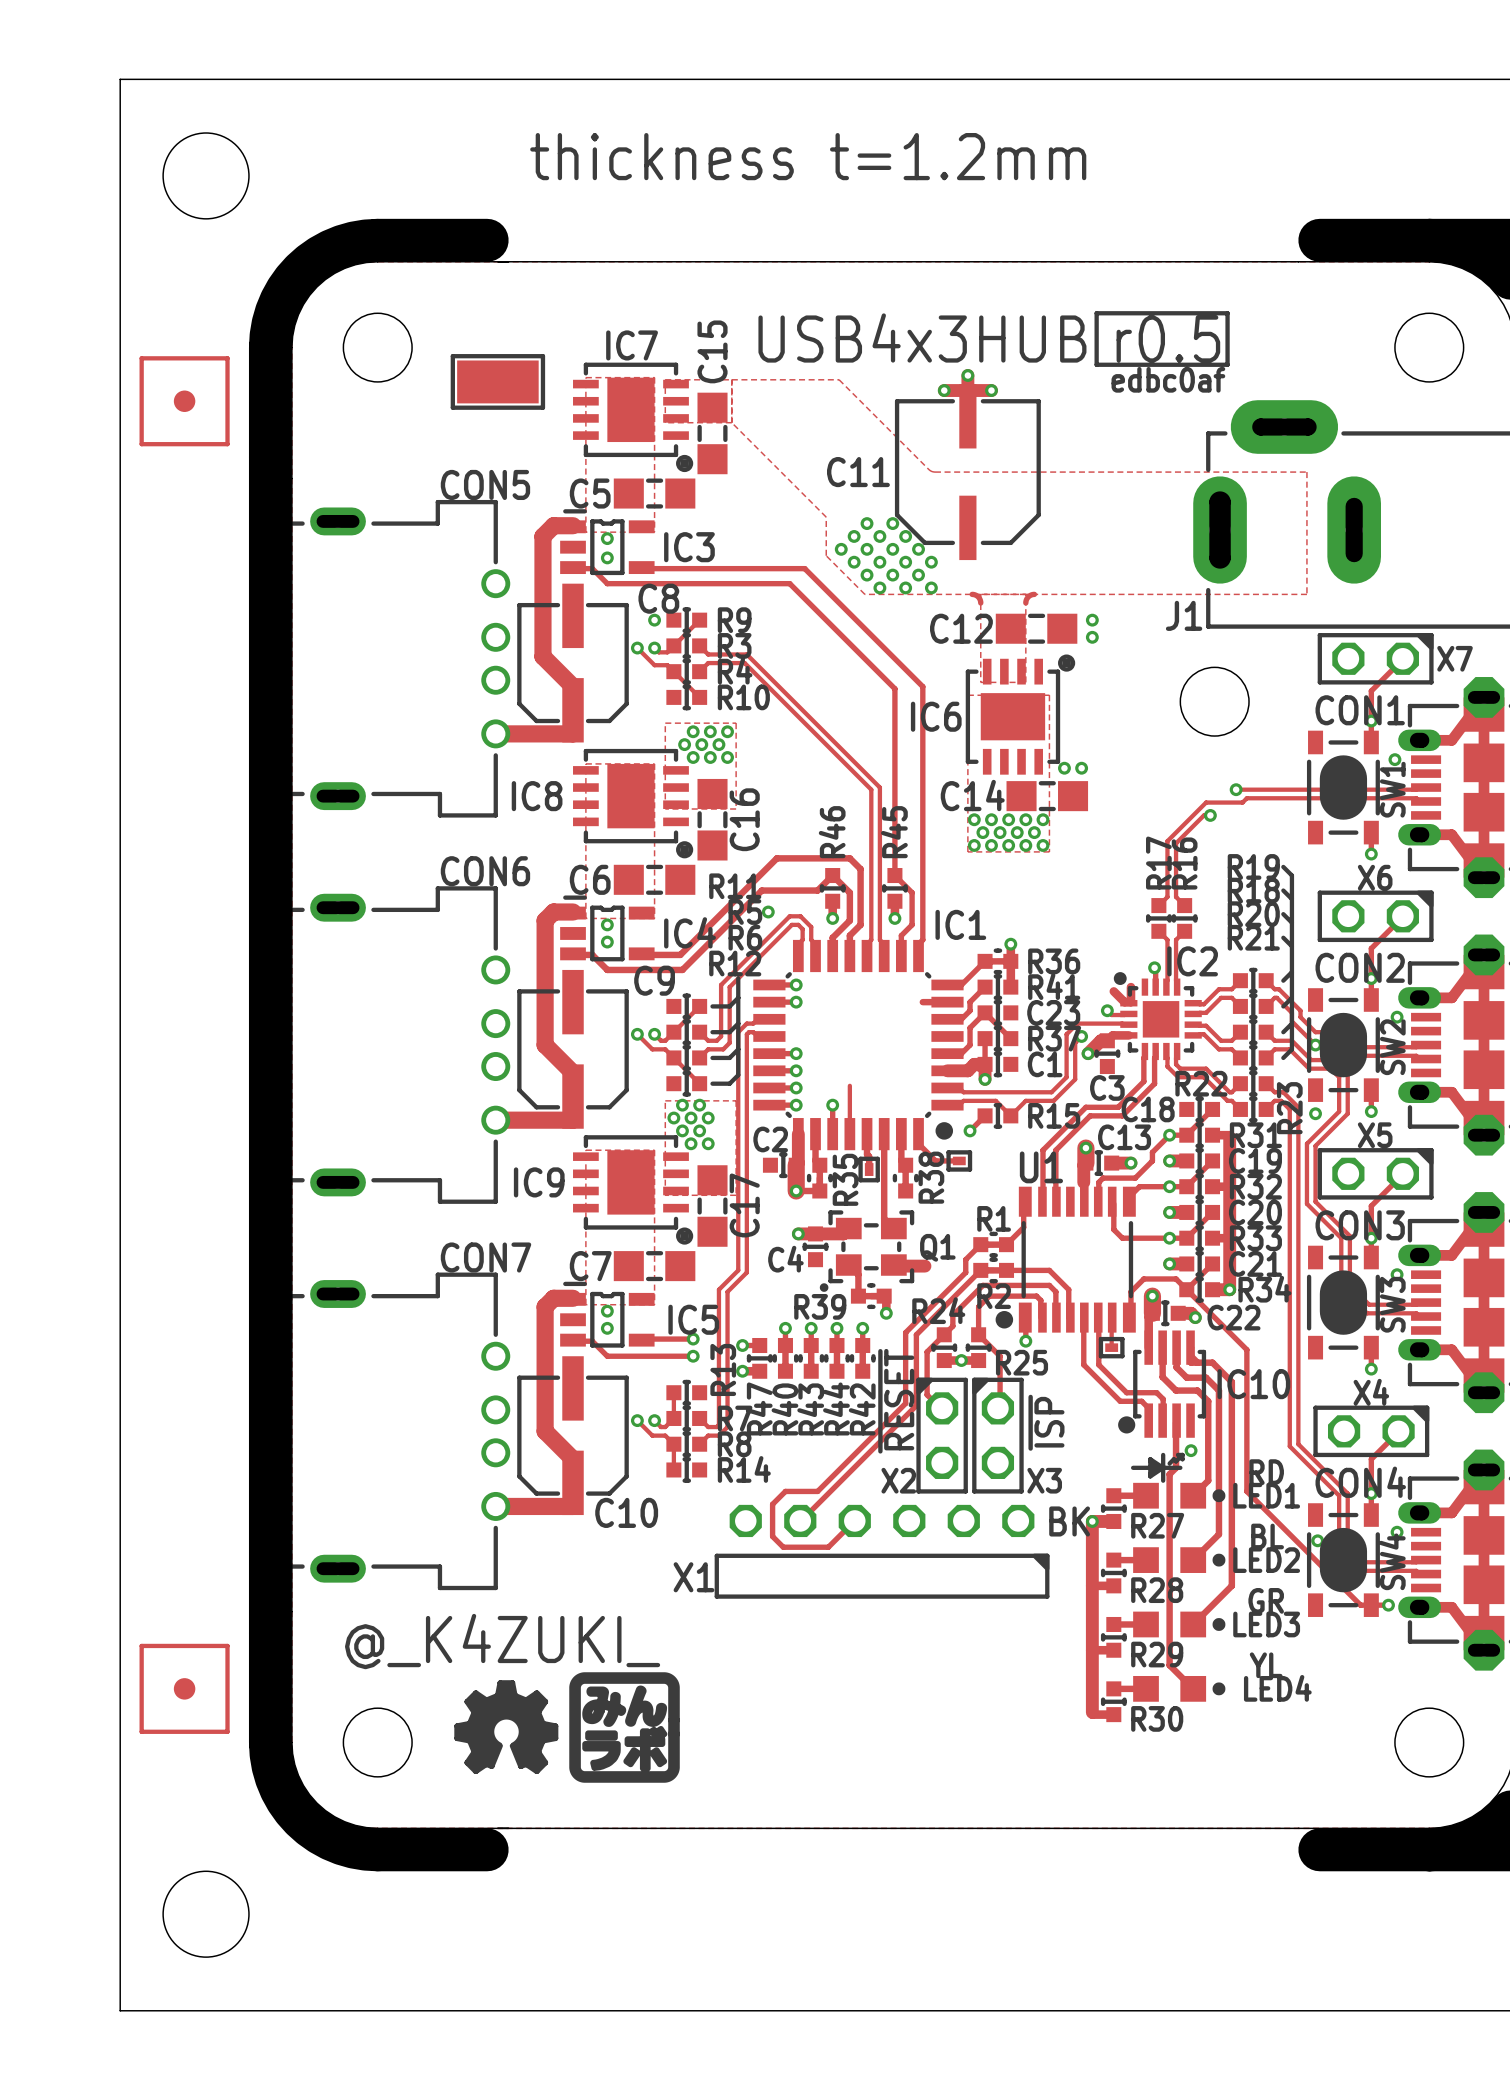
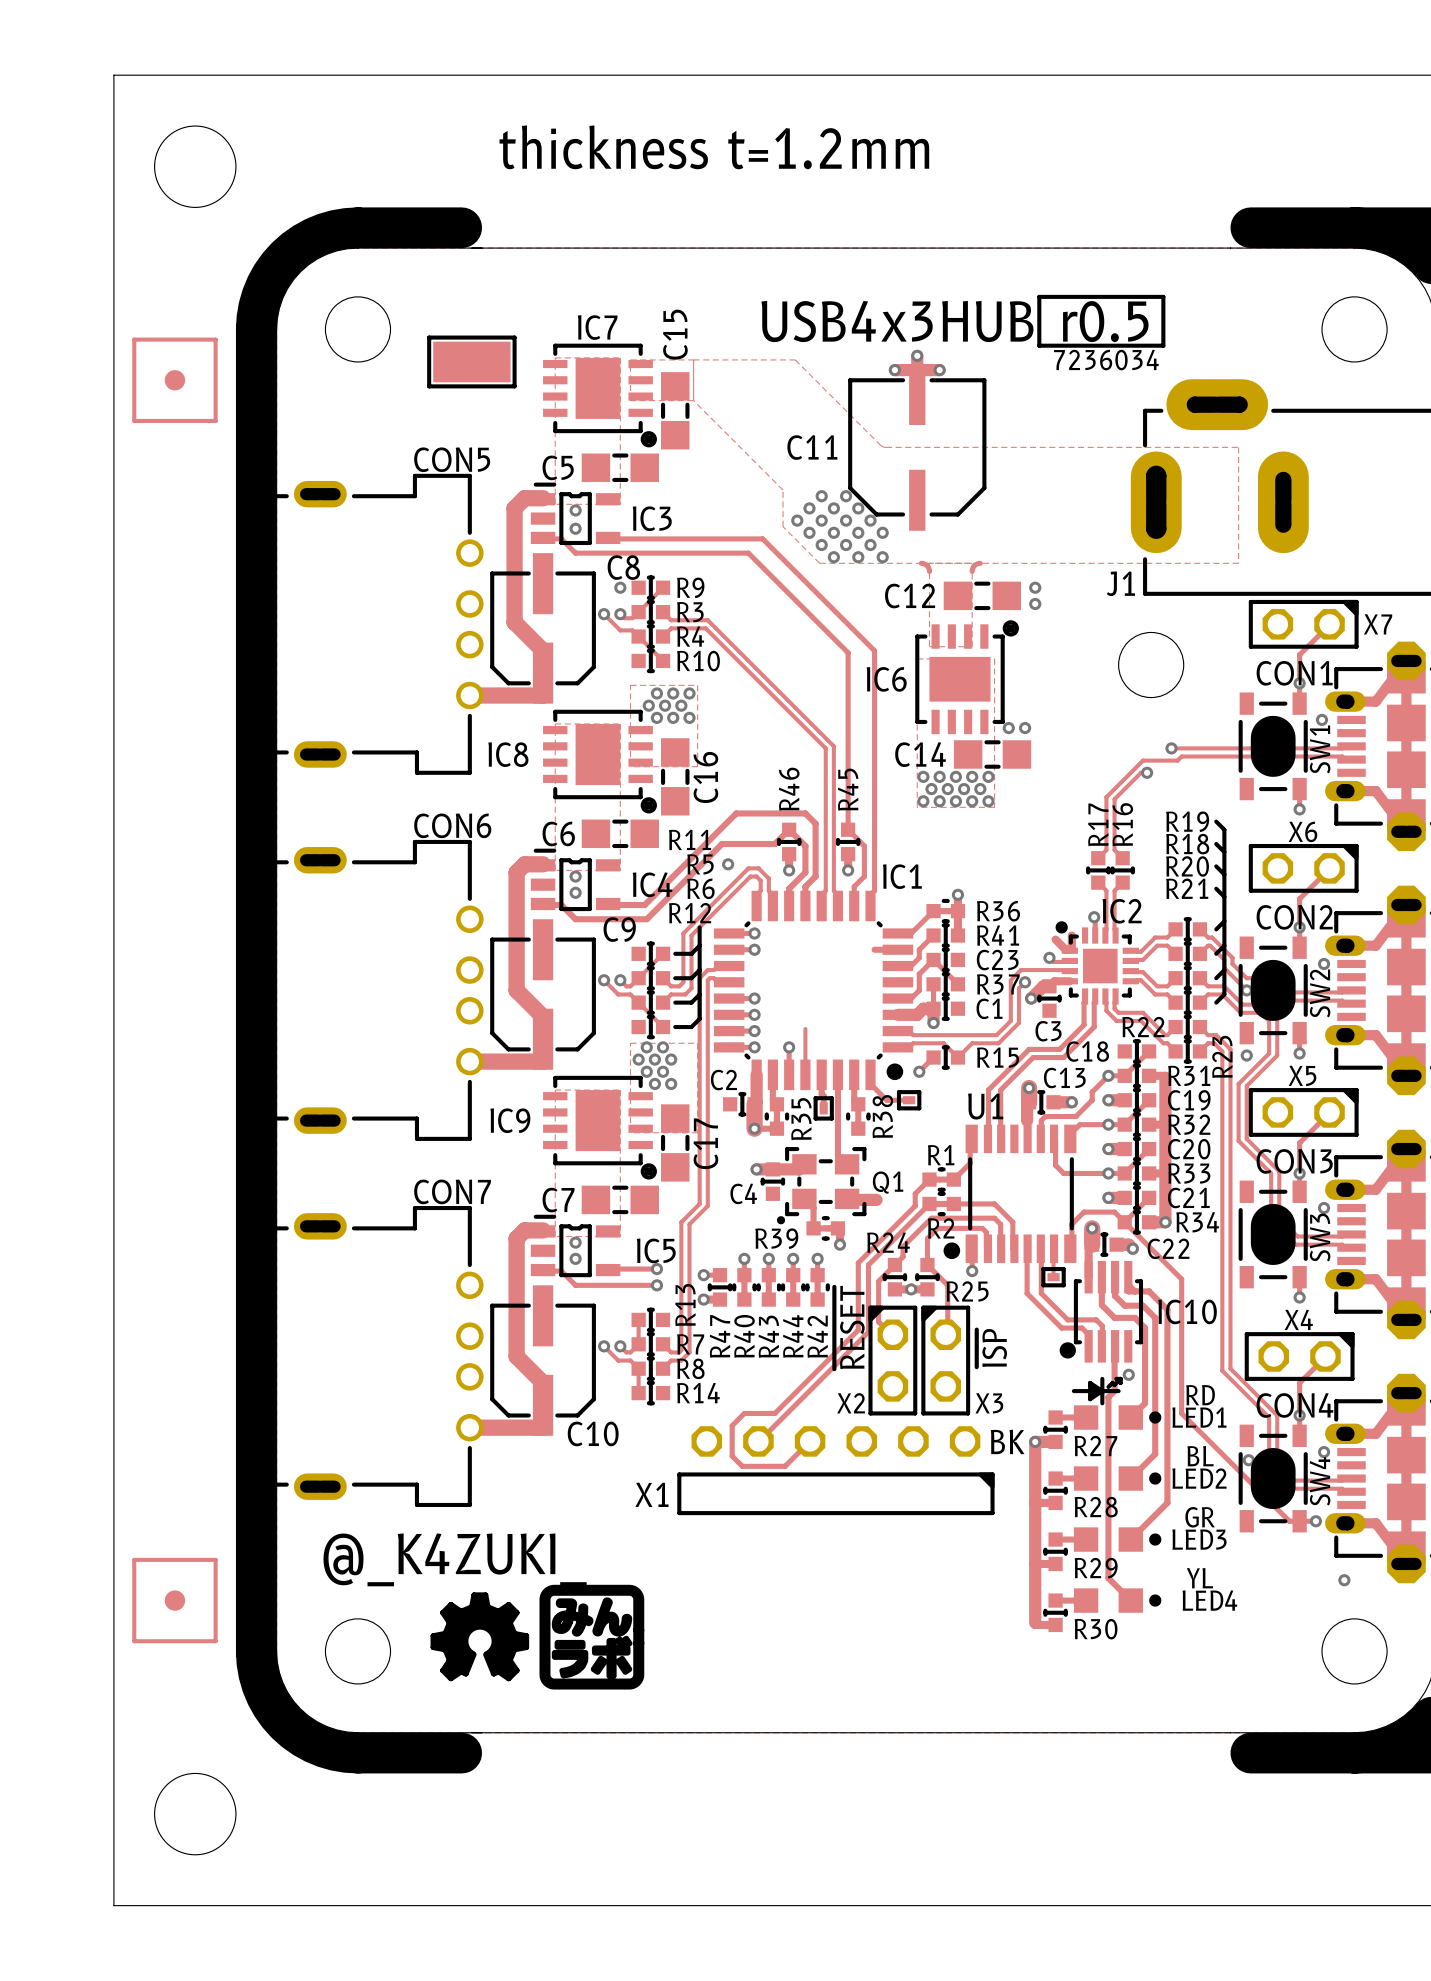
drawing shape: [1111, 366, 1226, 393] -> [1054, 349, 1159, 371]
via: none -> (1344, 1580)

